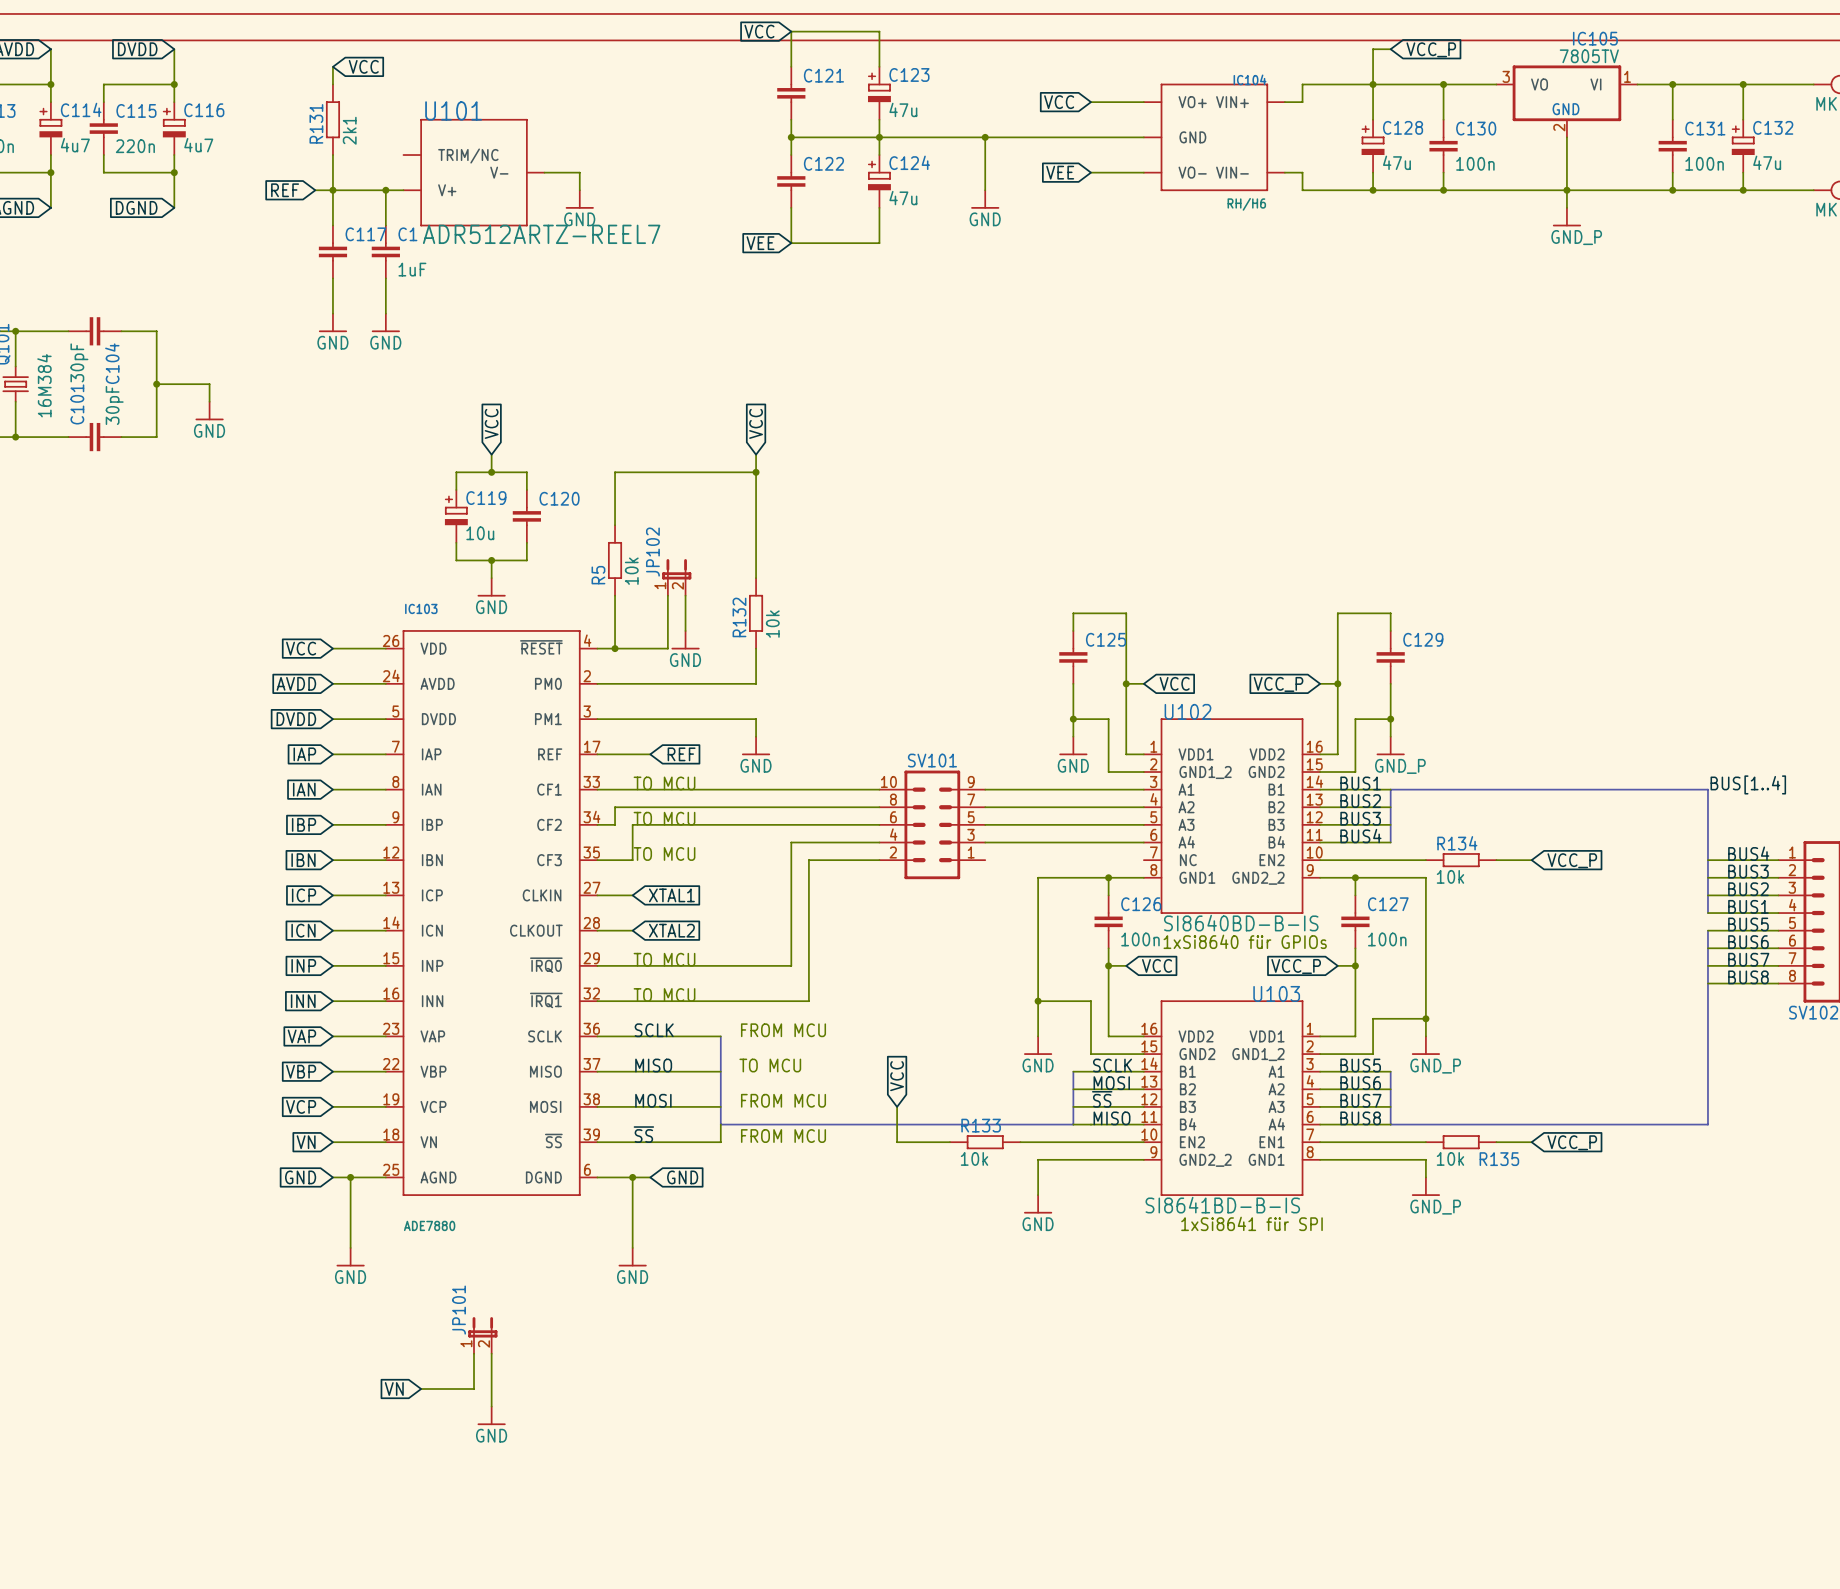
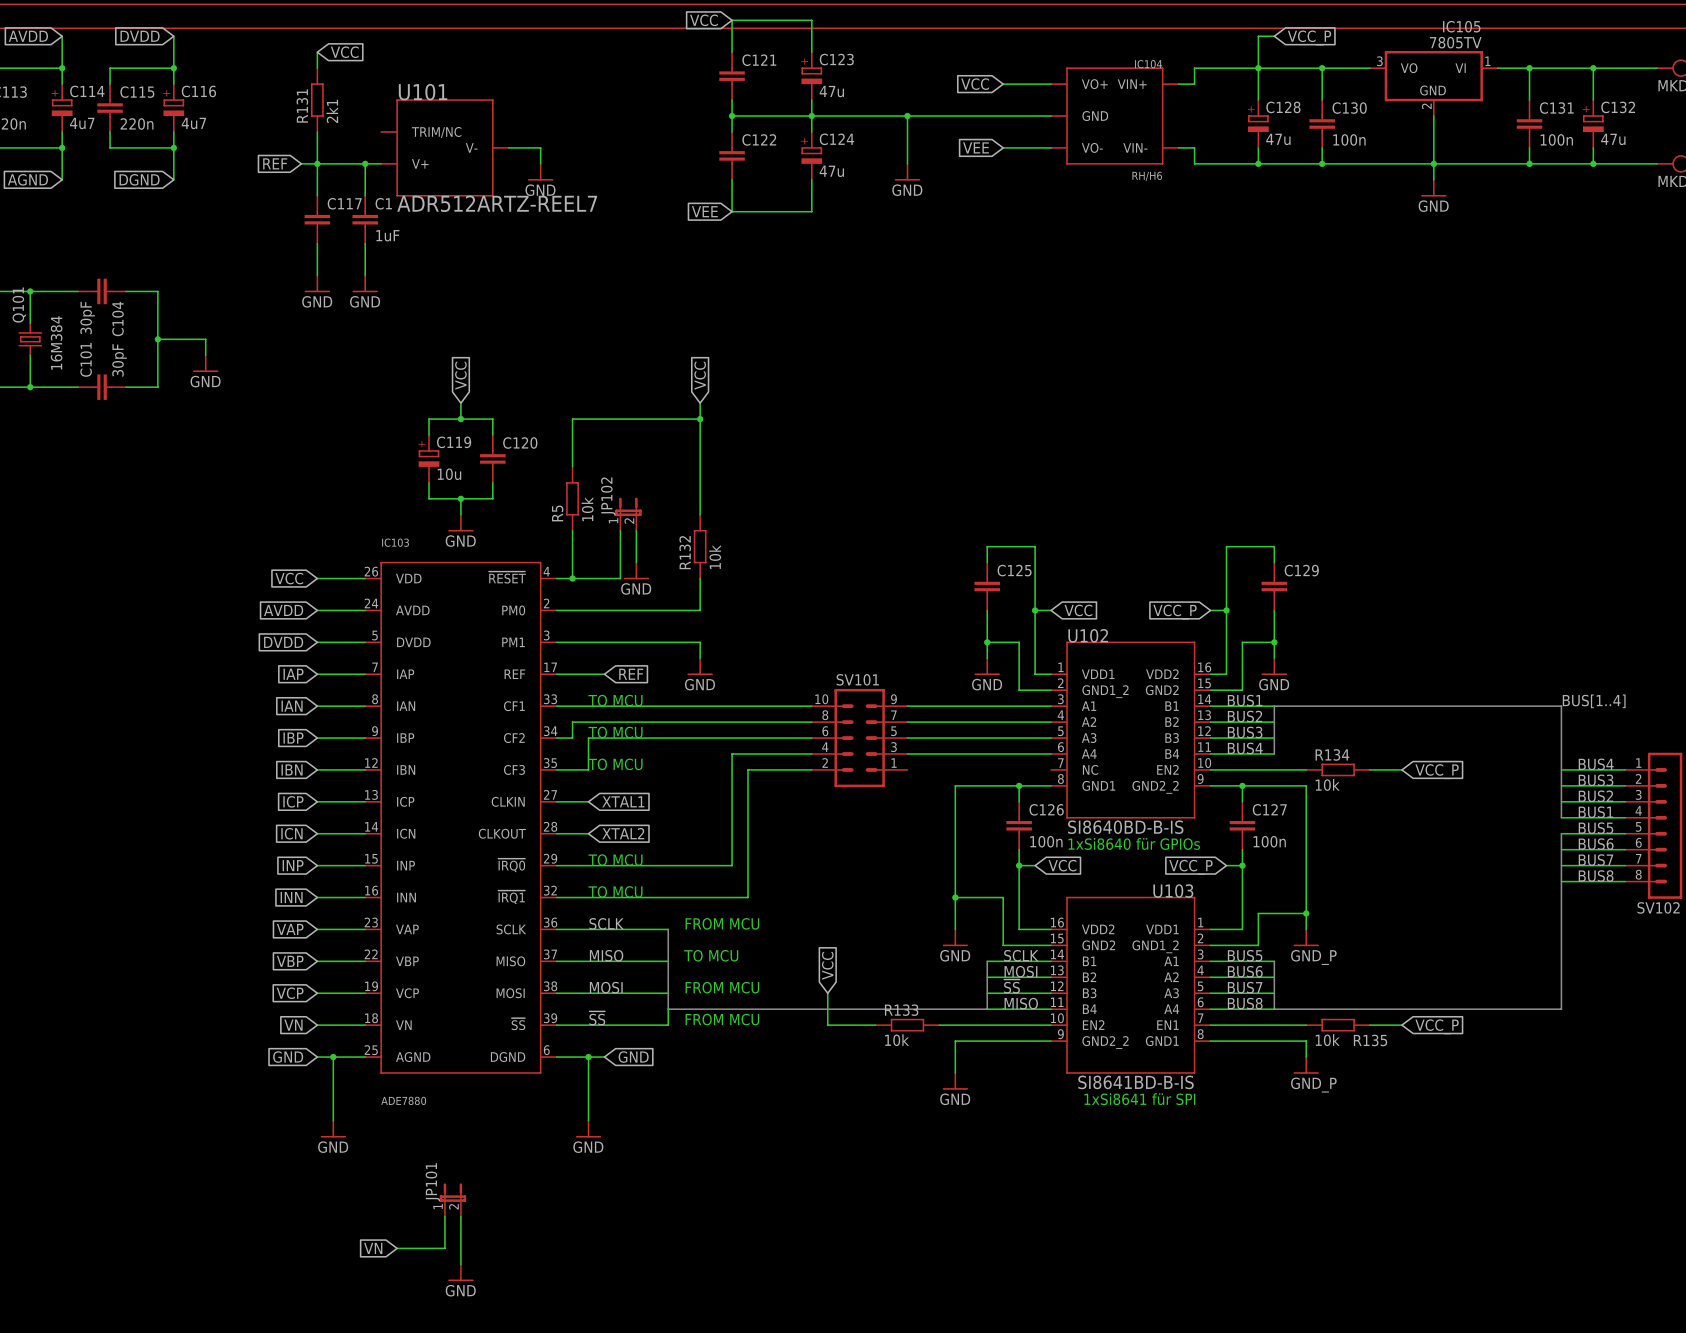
power symbol: GND_P (1566, 217) -> GND (1433, 188)
power symbol: GND_P (1390, 746) -> GND (1274, 666)

